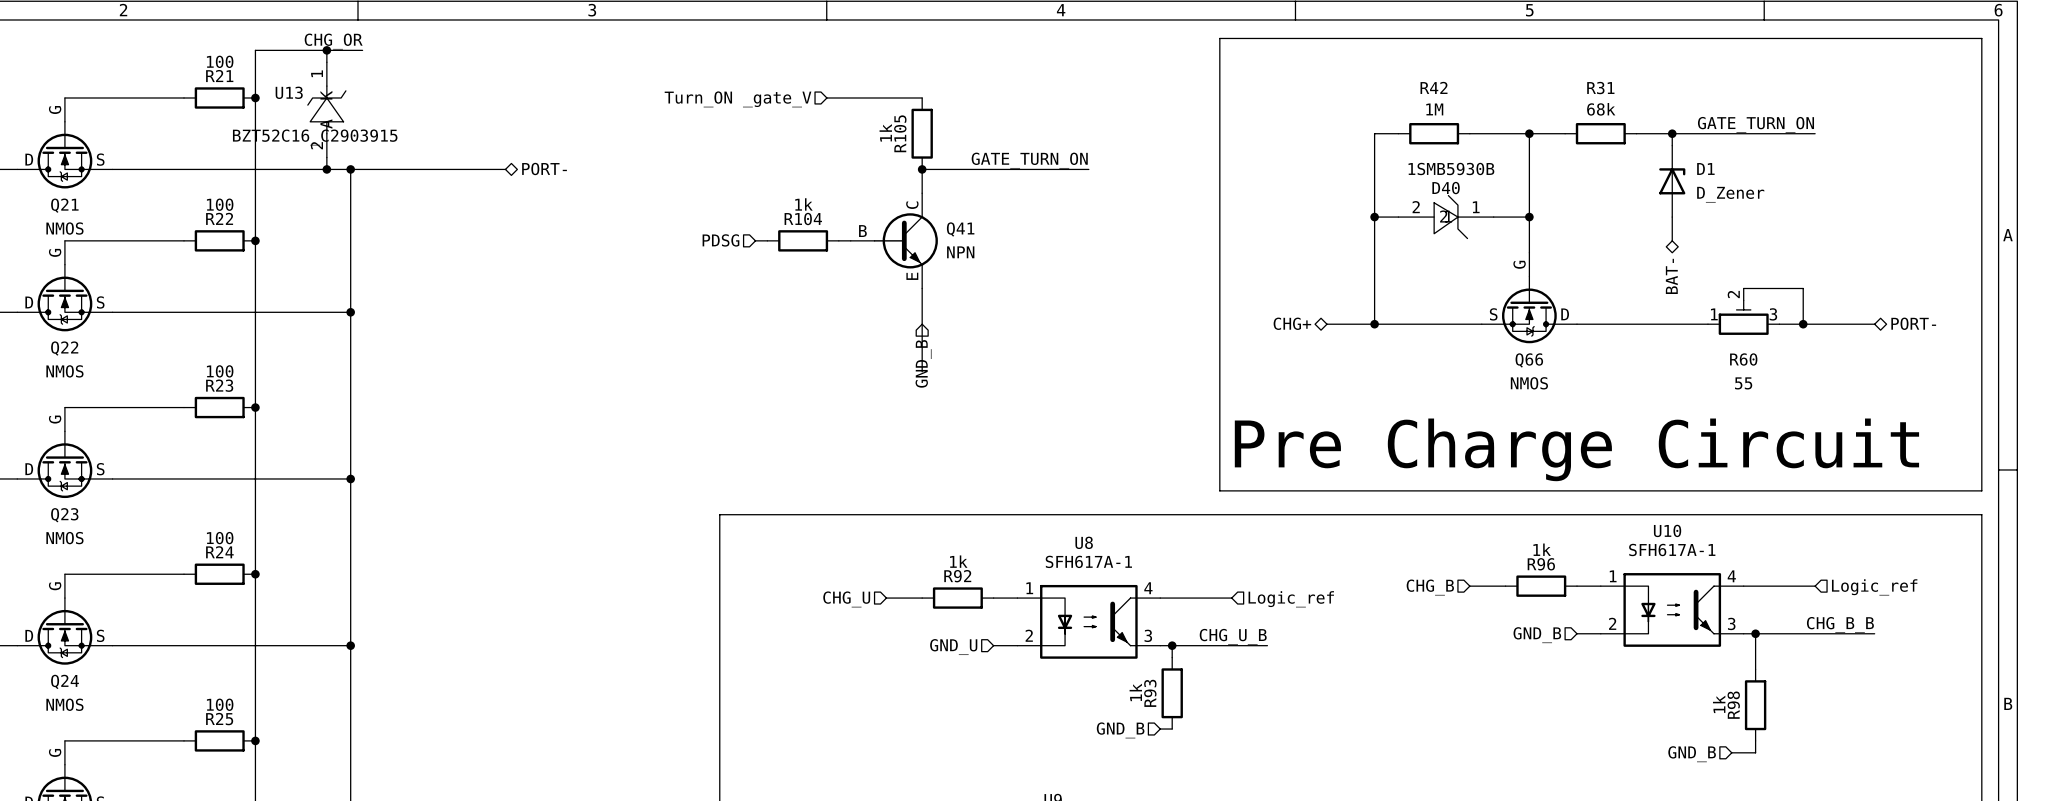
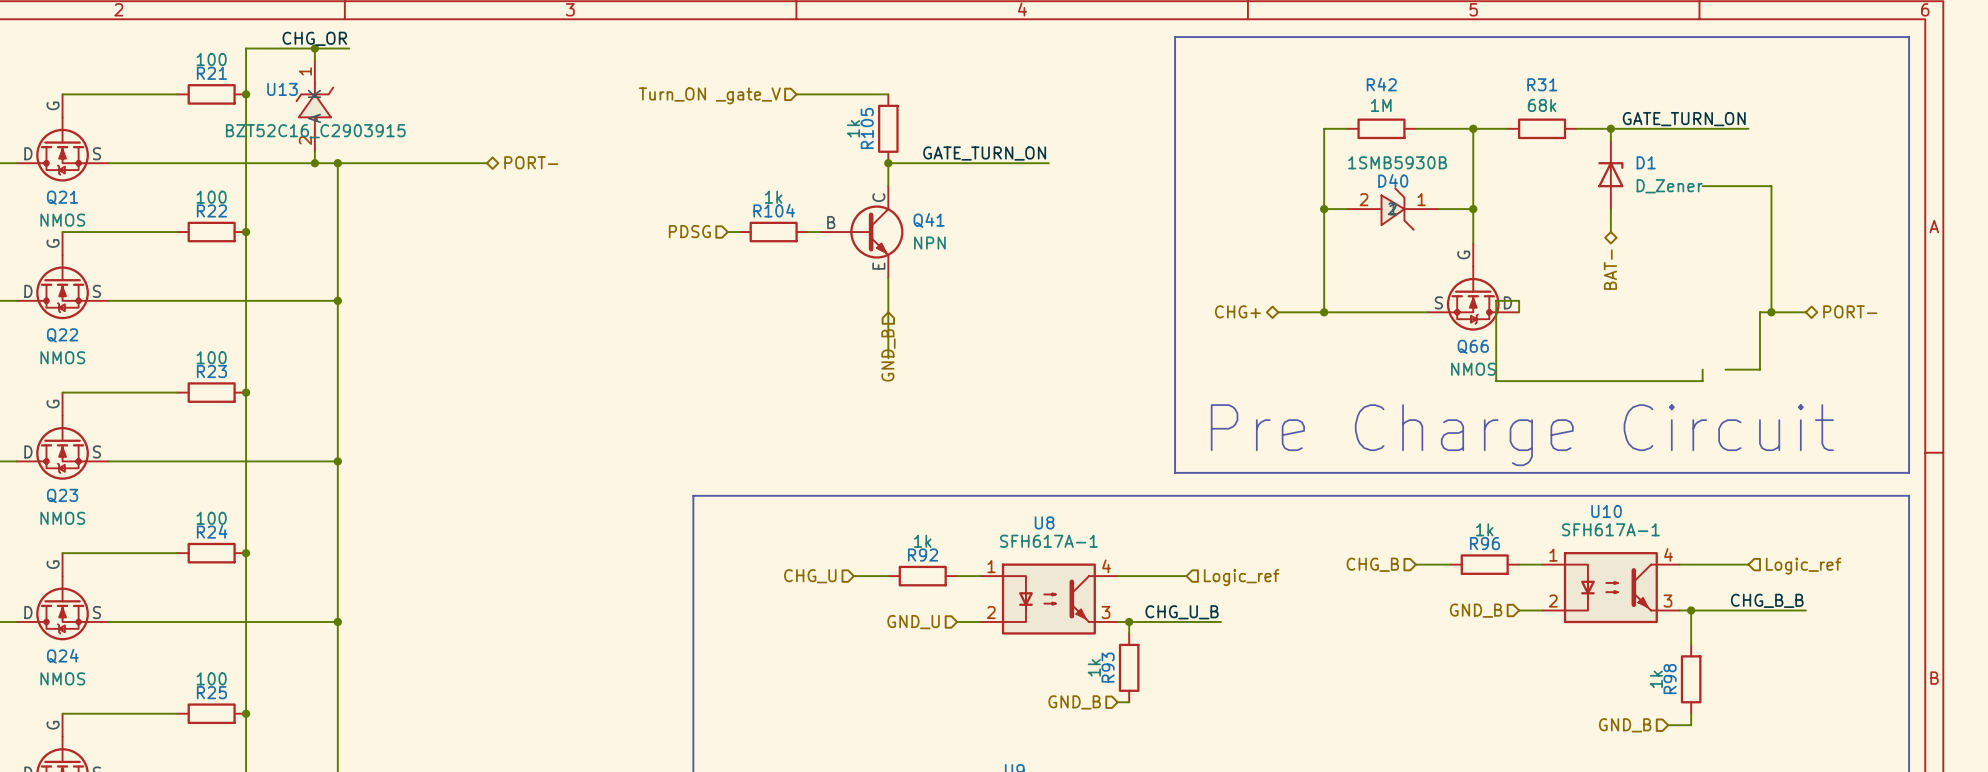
wire: none -> (1702, 186) (1771, 186) (1771, 312)
wire: (1743, 288) (1803, 288) (1803, 324) -> none
R60: 55 (1743, 311) -> none
wire: (1577, 324) (1707, 324) -> (1519, 312) (1519, 300) (1496, 300) (1496, 381) (1702, 381) (1702, 369)
wire: (1779, 324) (1827, 324) -> (1725, 369) (1759, 369) (1759, 312)
junction position: (1803, 324) -> (1771, 312)

